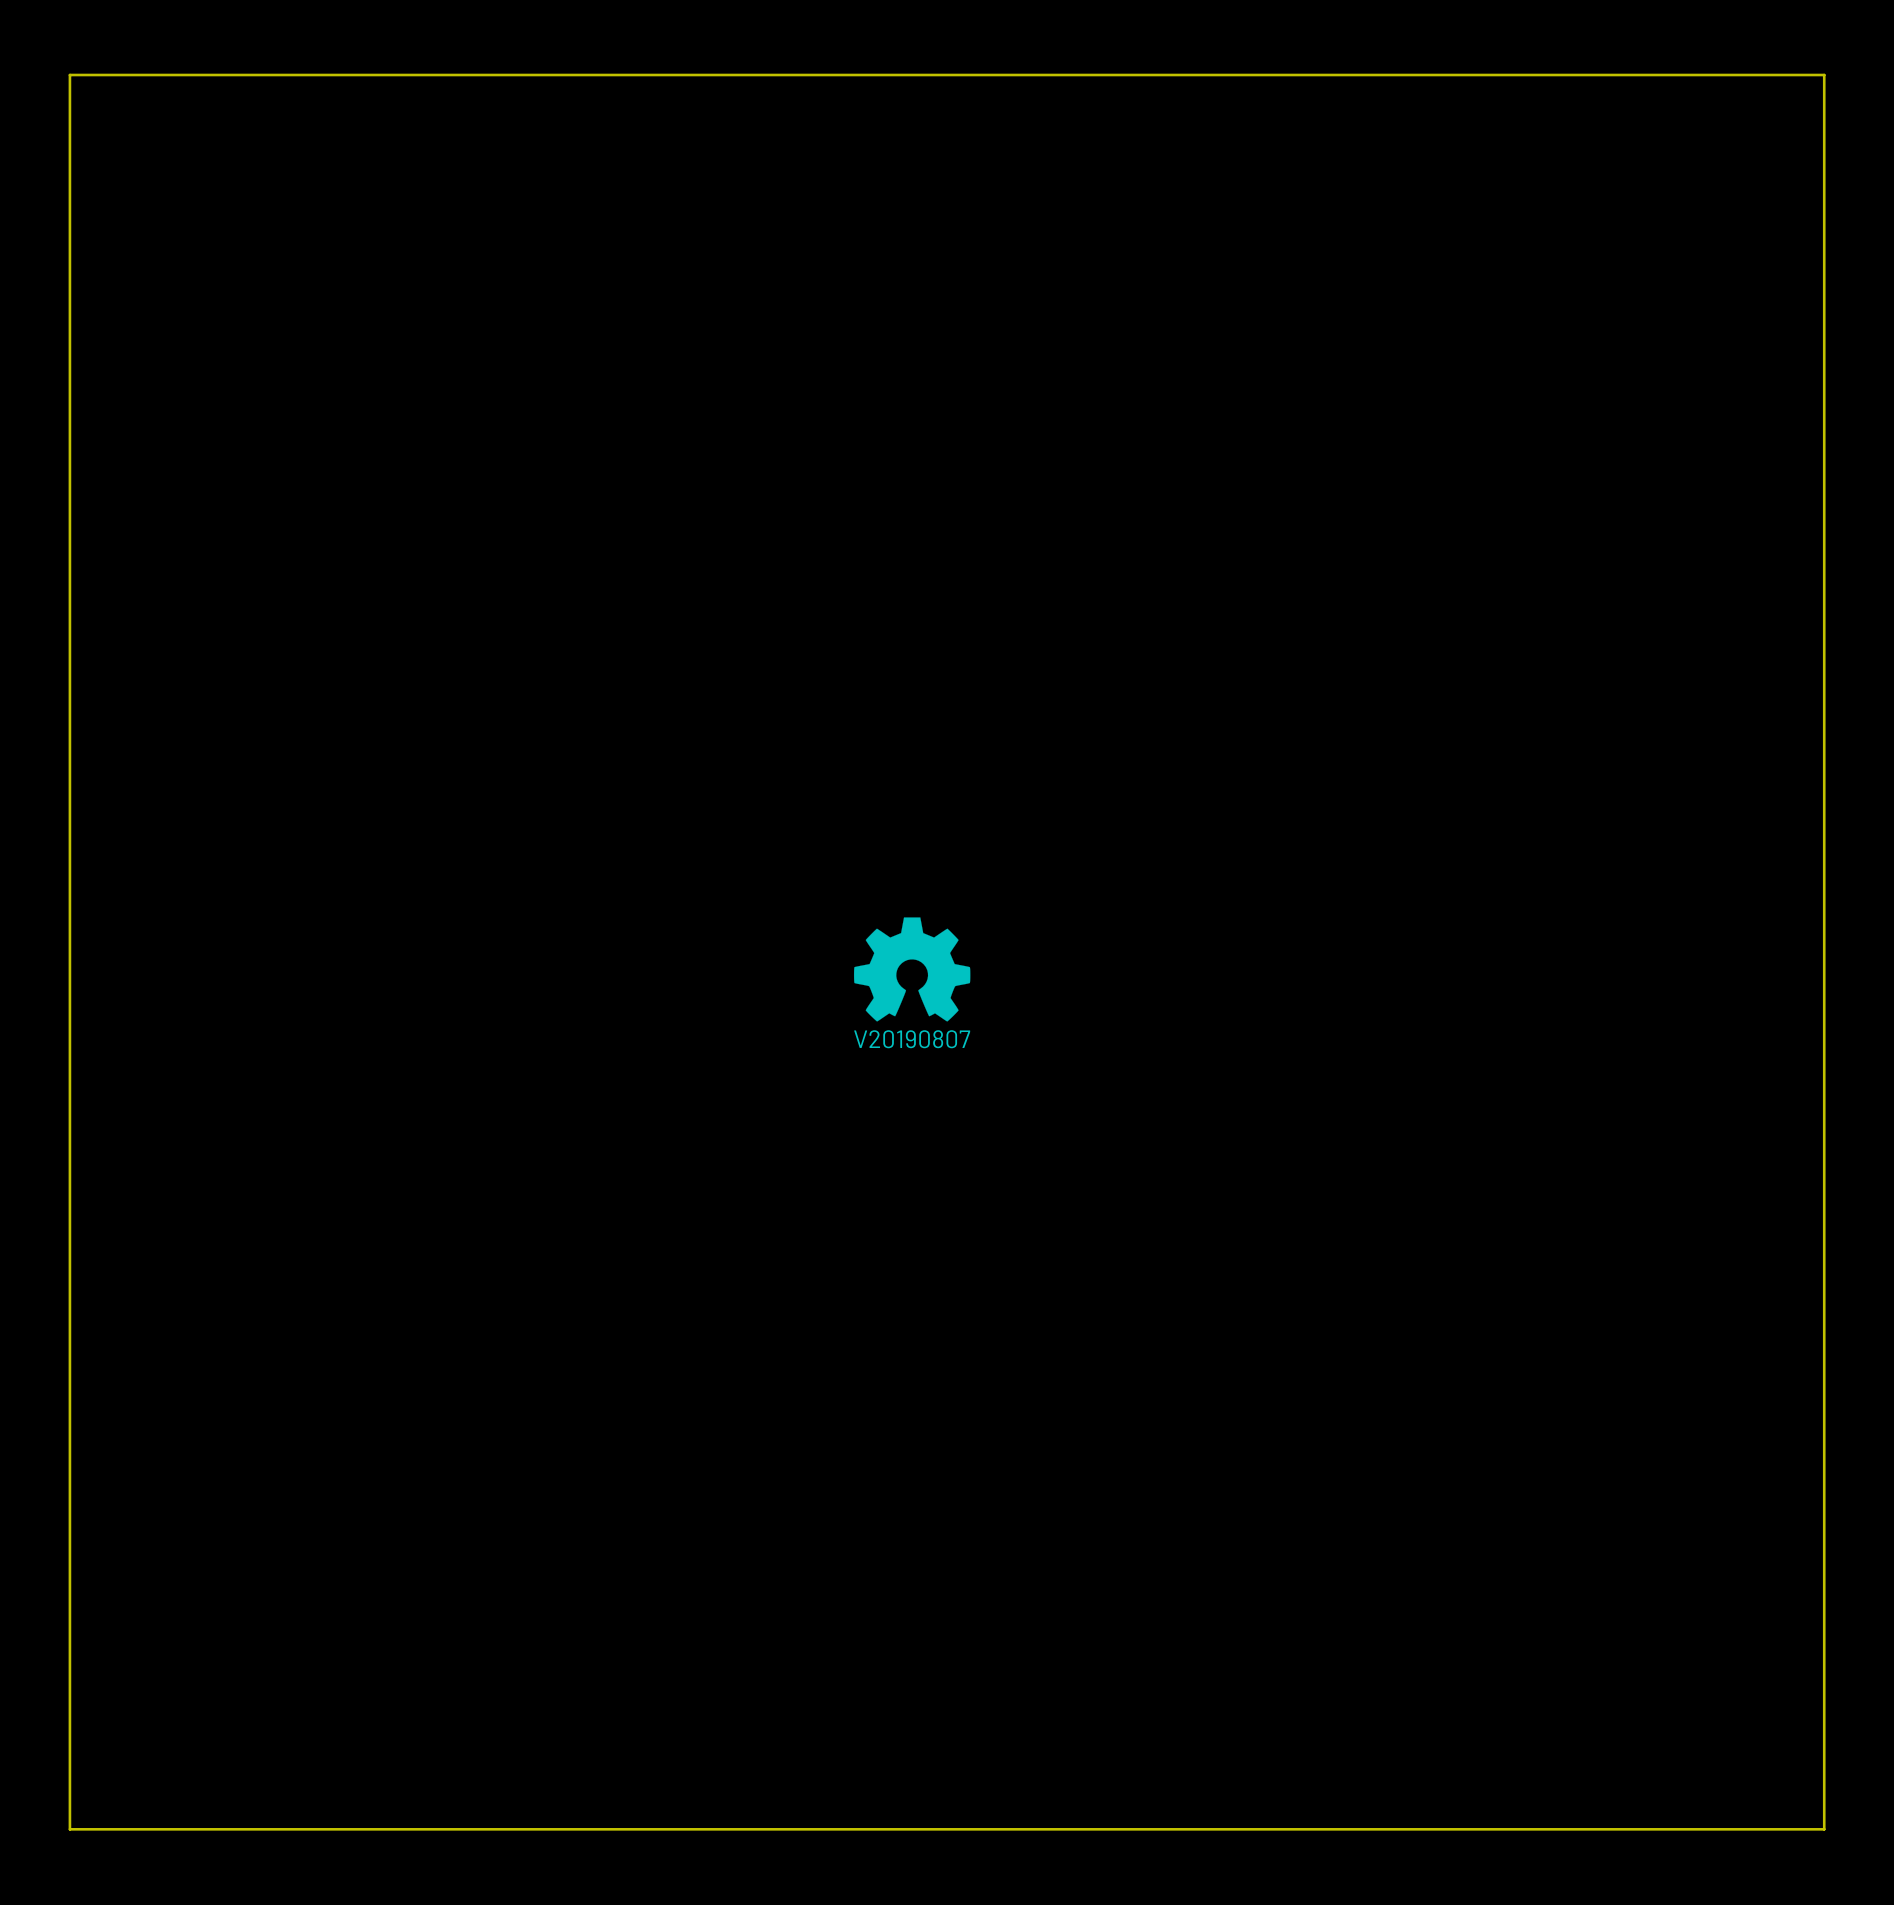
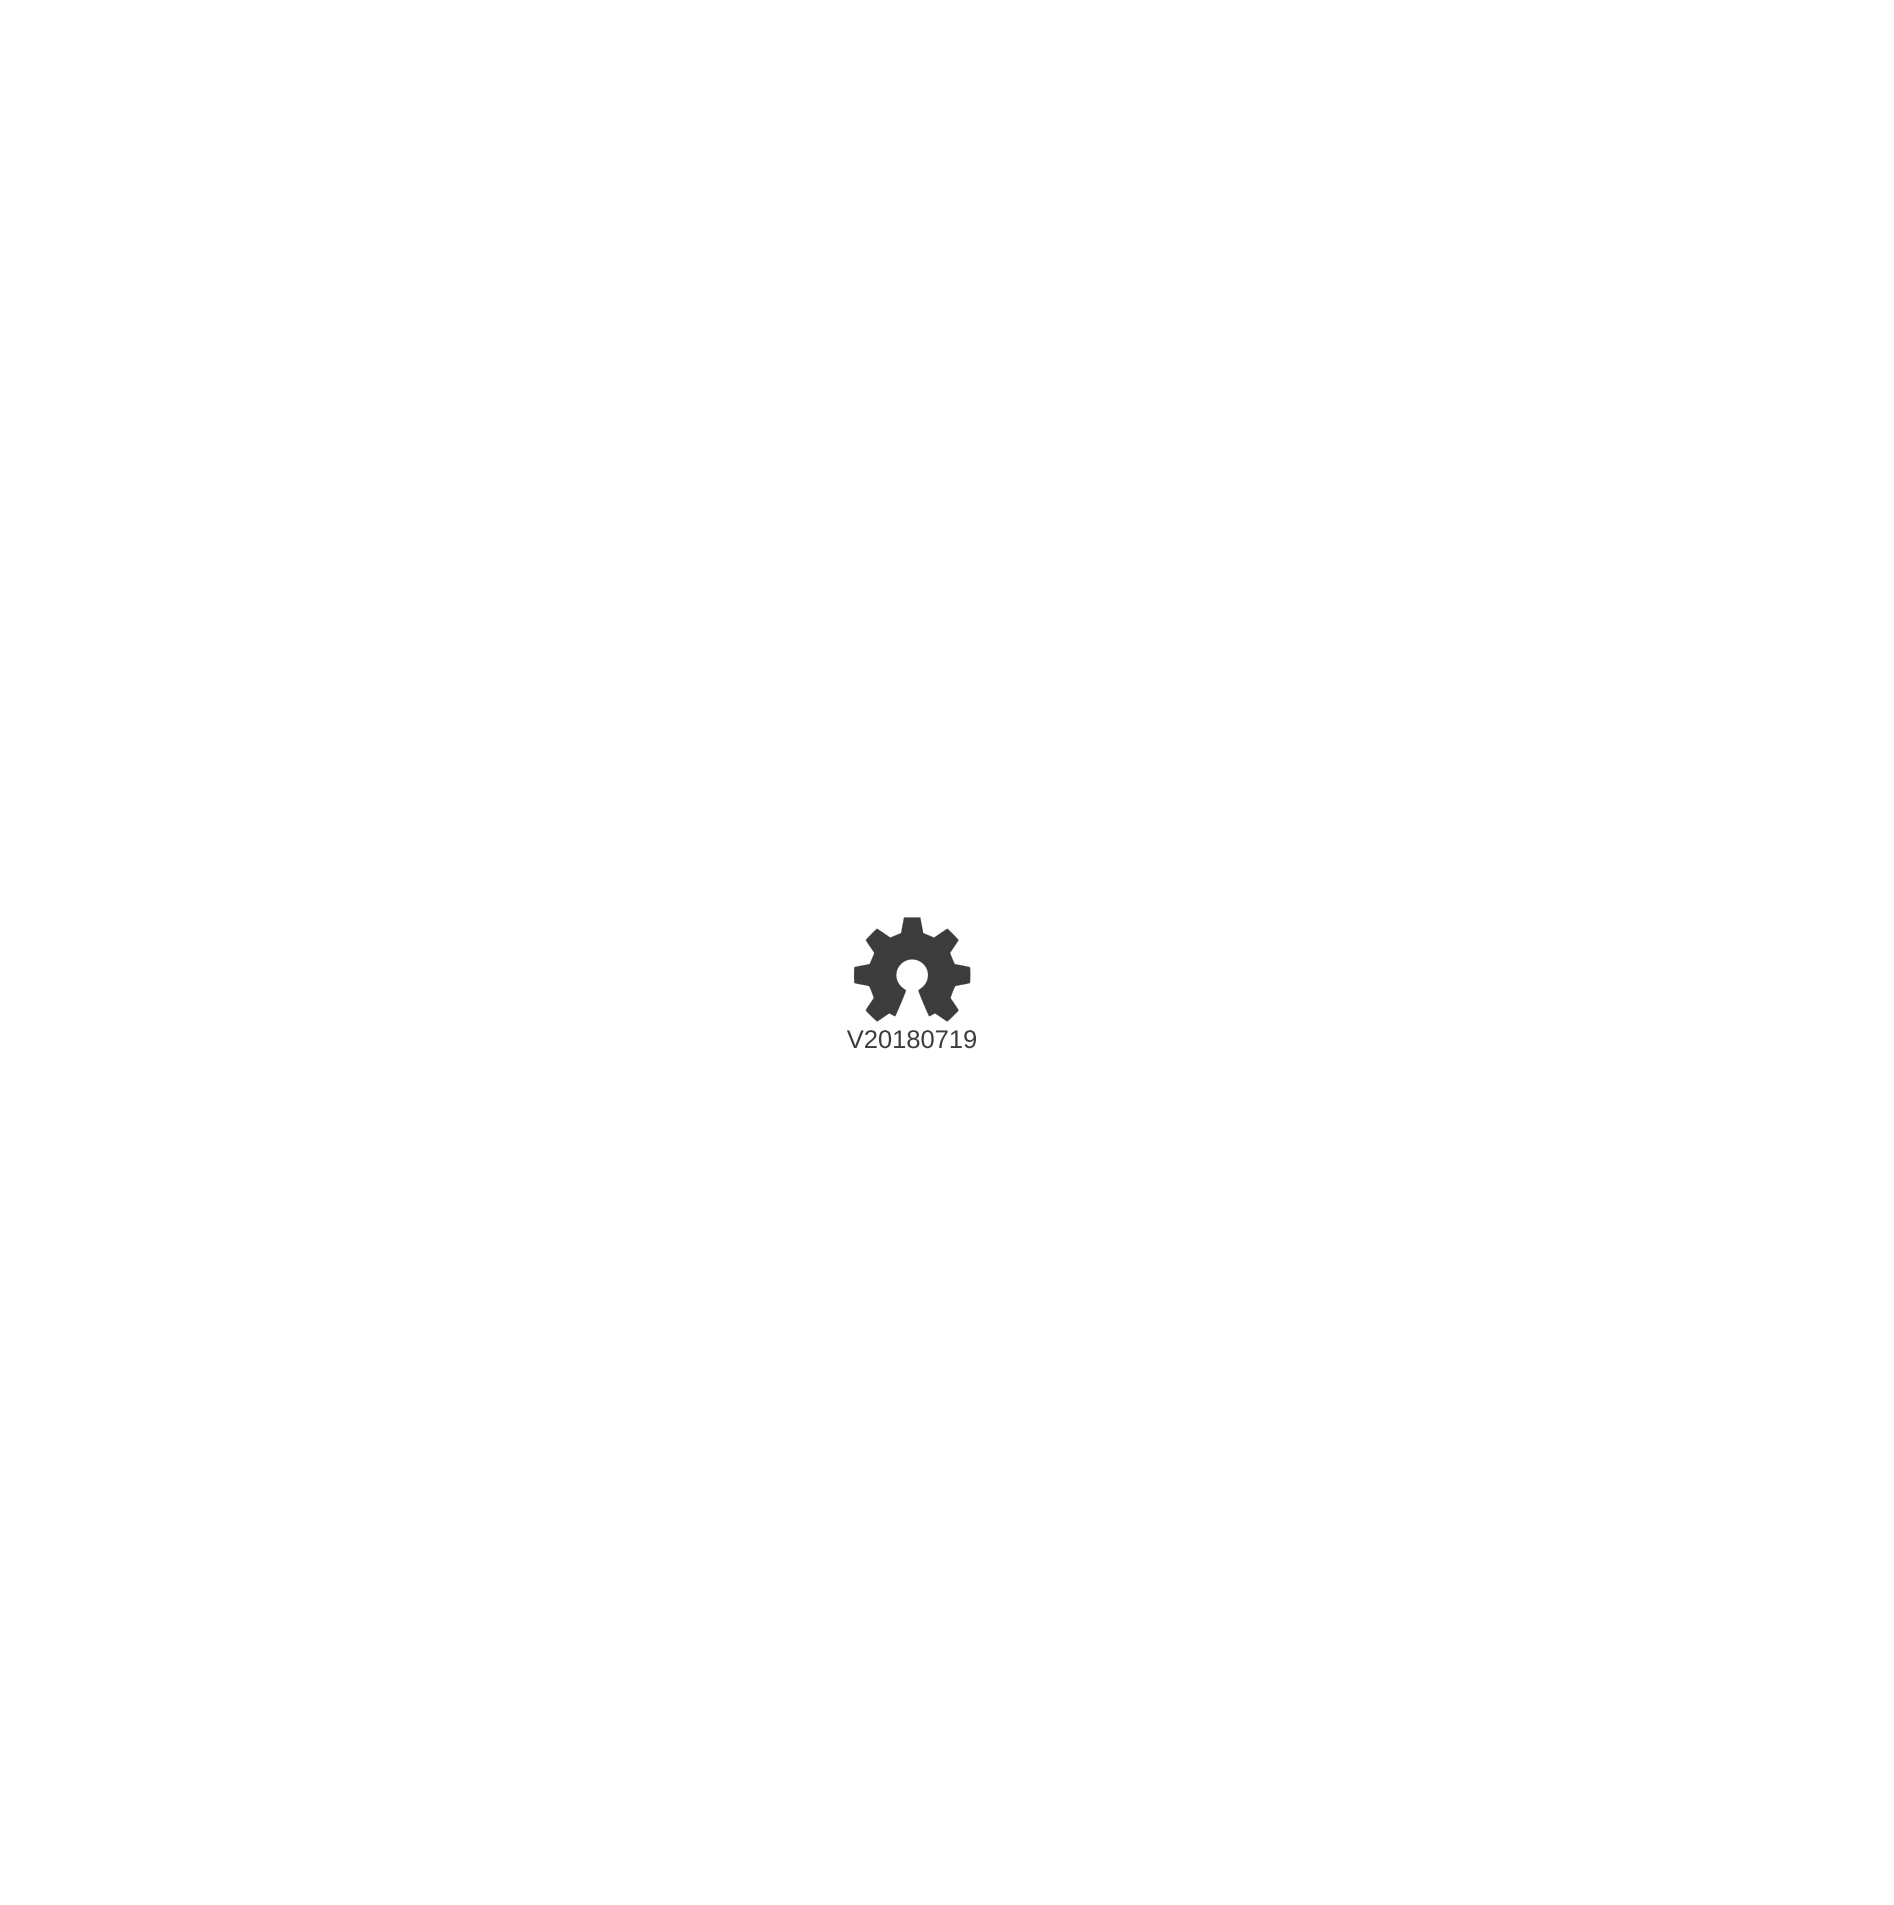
board edge: (69, 75) (69, 1829) (1824, 1829) (1824, 75) (69, 75) -> none
drawing shape: [854, 1030, 971, 1049] -> [846, 1030, 977, 1049]

